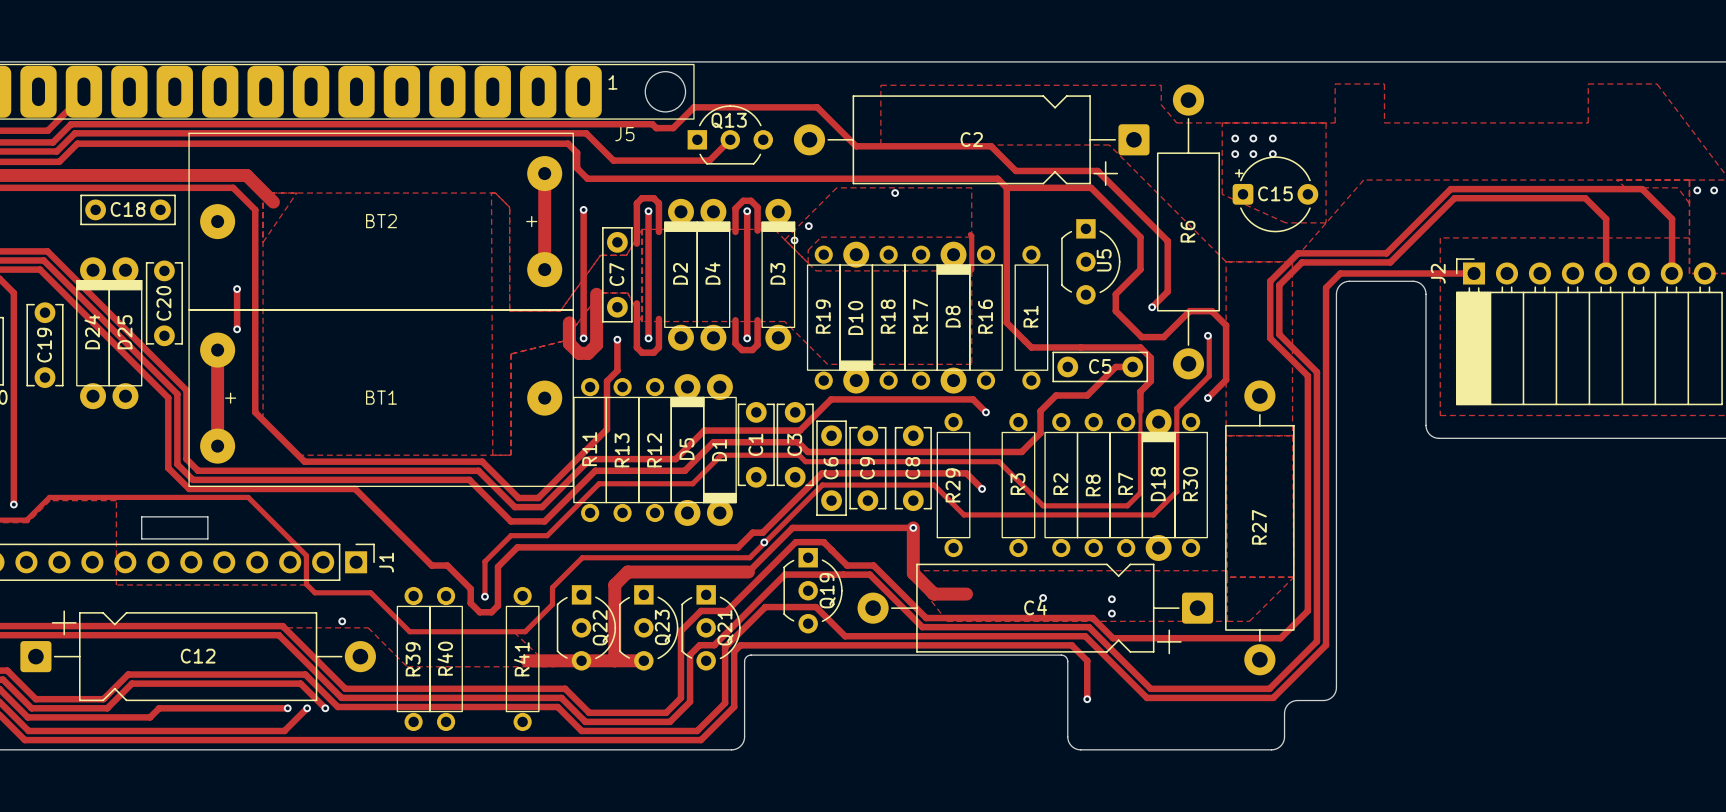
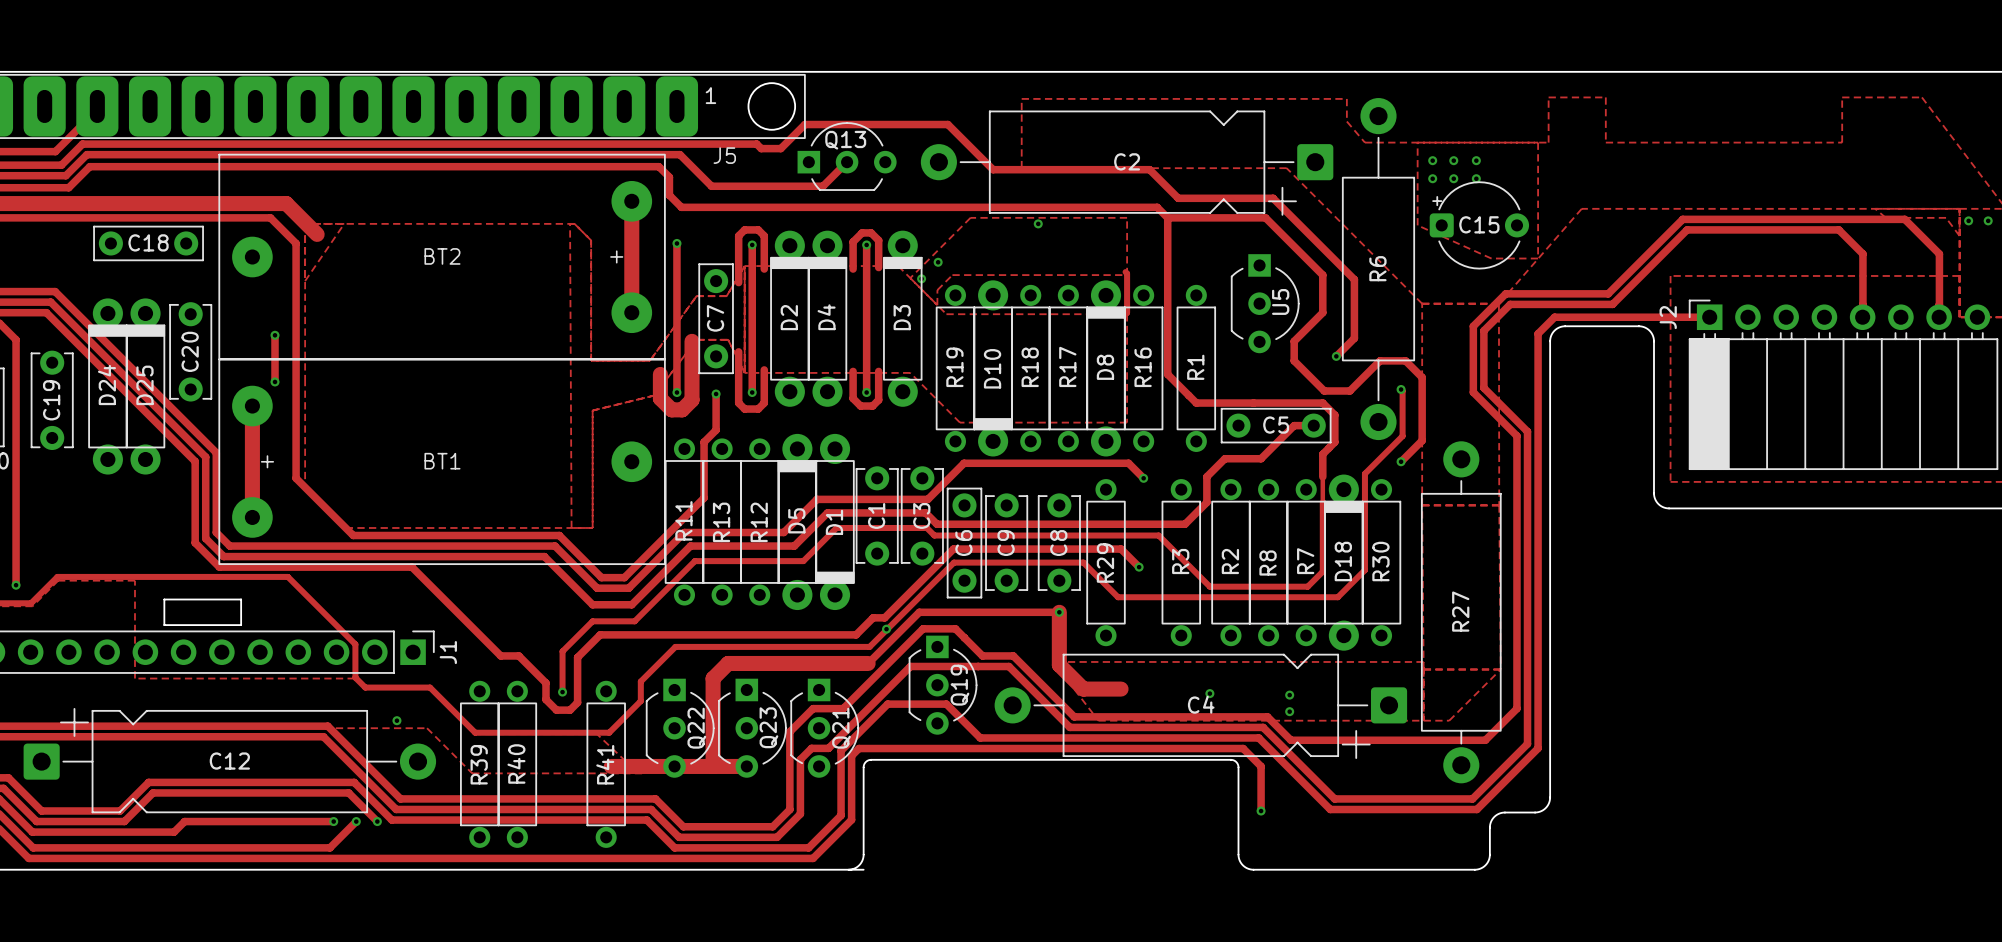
board edge: none -> (848, 869) (863, 869)

